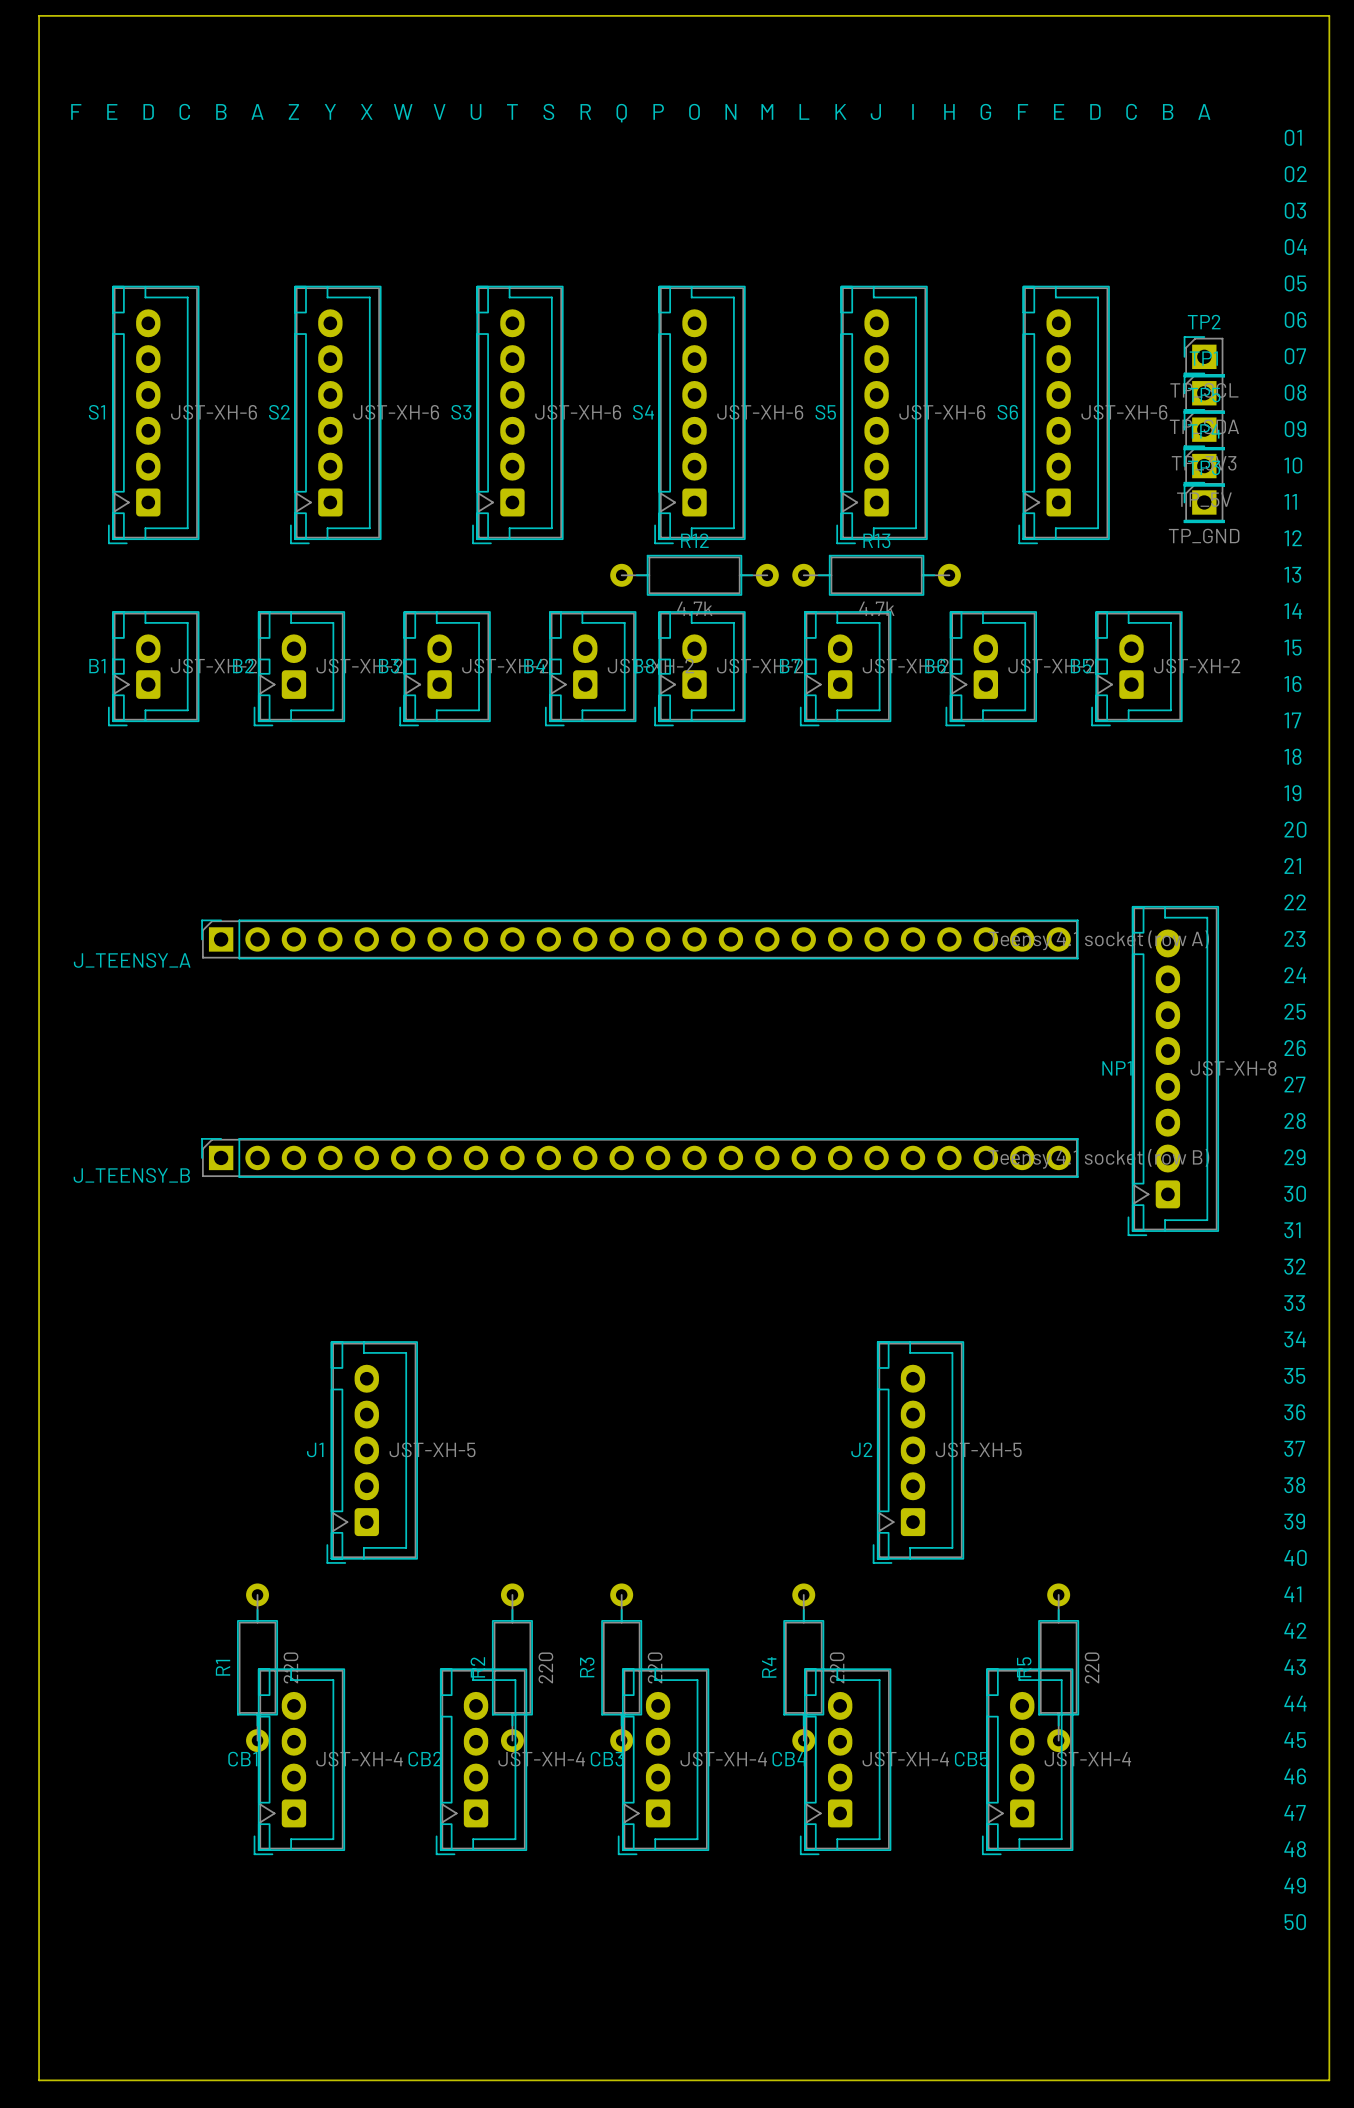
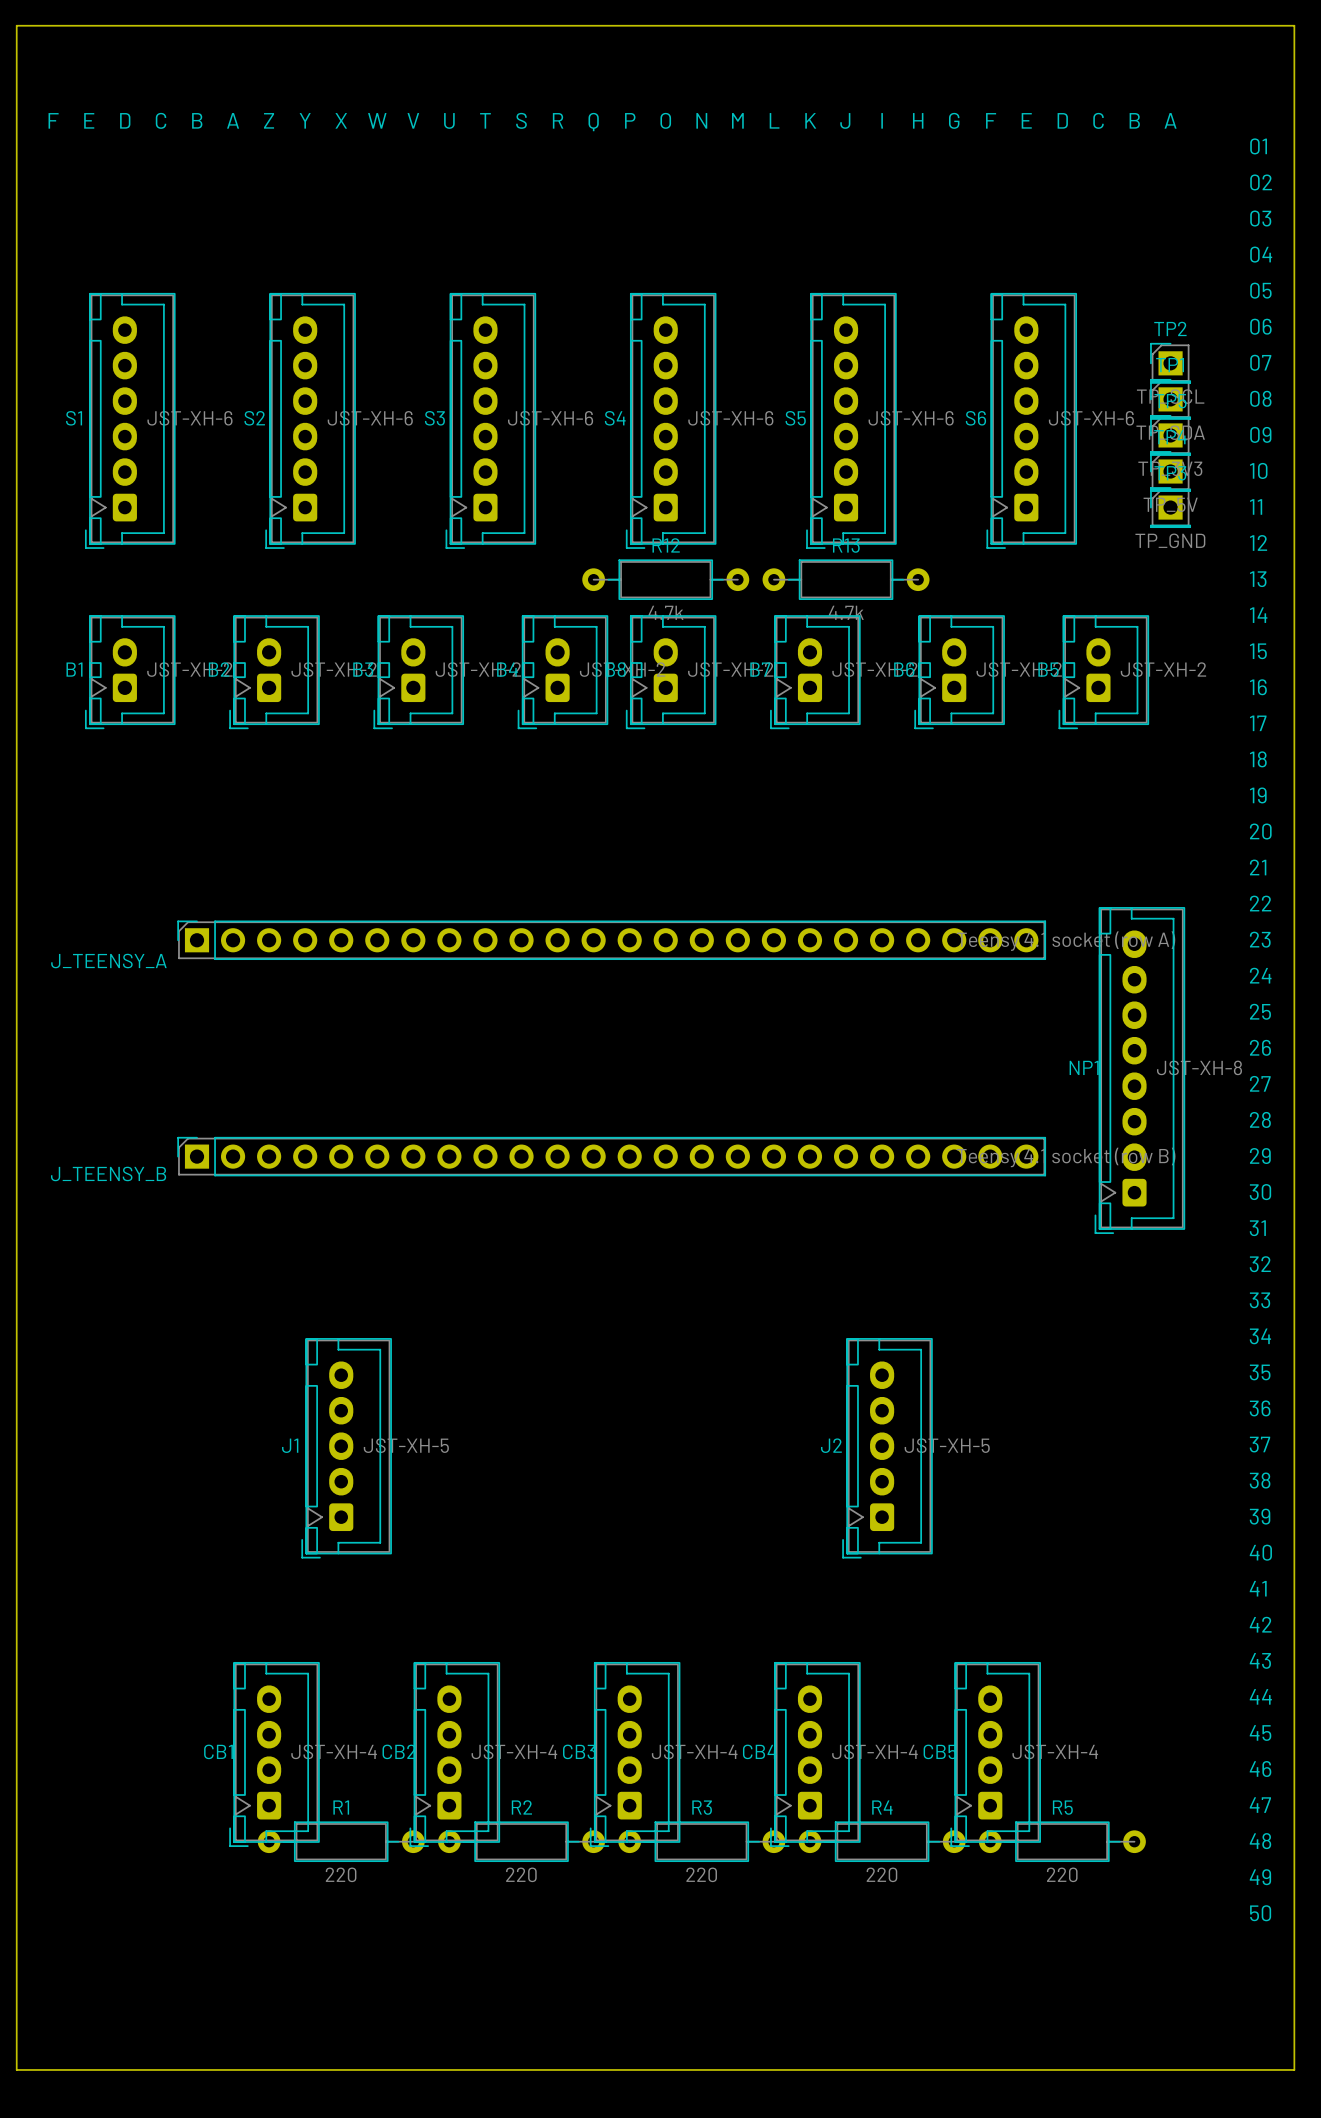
R1 rotation: 0° (257, 1667) -> 90° clockwise (341, 1841)
R1 position: (257, 1667) -> (341, 1841)
R2 rotation: 0° (512, 1667) -> 90° clockwise (521, 1841)
R2 position: (512, 1667) -> (521, 1841)
R3 rotation: 0° (621, 1667) -> 90° clockwise (701, 1841)
R3 position: (621, 1667) -> (701, 1841)
R4 rotation: 0° (803, 1667) -> 90° clockwise (882, 1841)
R4 position: (803, 1667) -> (882, 1841)
R5 rotation: 0° (1058, 1667) -> 90° clockwise (1062, 1841)
R5 position: (1058, 1667) -> (1062, 1841)

